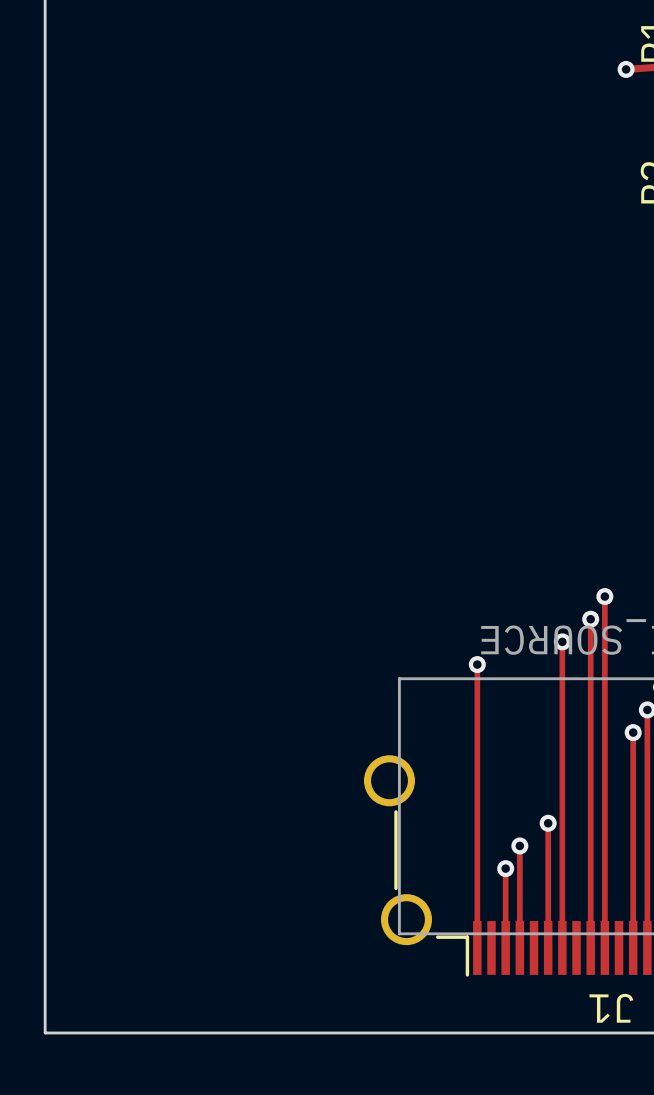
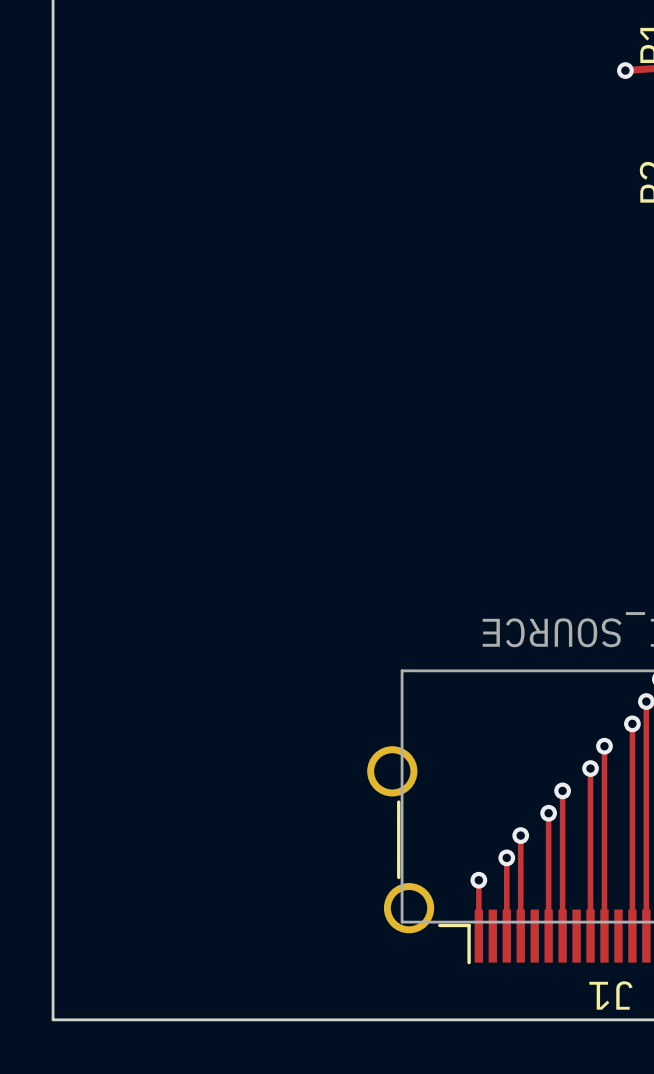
top track: (604, 596) (604, 755) -> none
via: (604, 596) -> none
top track: (590, 619) (590, 777) -> none
via: (590, 619) -> none
top track: (562, 641) (562, 800) -> none
via: (562, 641) -> none
top track: (477, 664) (477, 891) -> none
via: (477, 664) -> none
via: none -> (604, 746)
via: none -> (590, 768)
via: none -> (562, 790)
via: none -> (478, 880)

